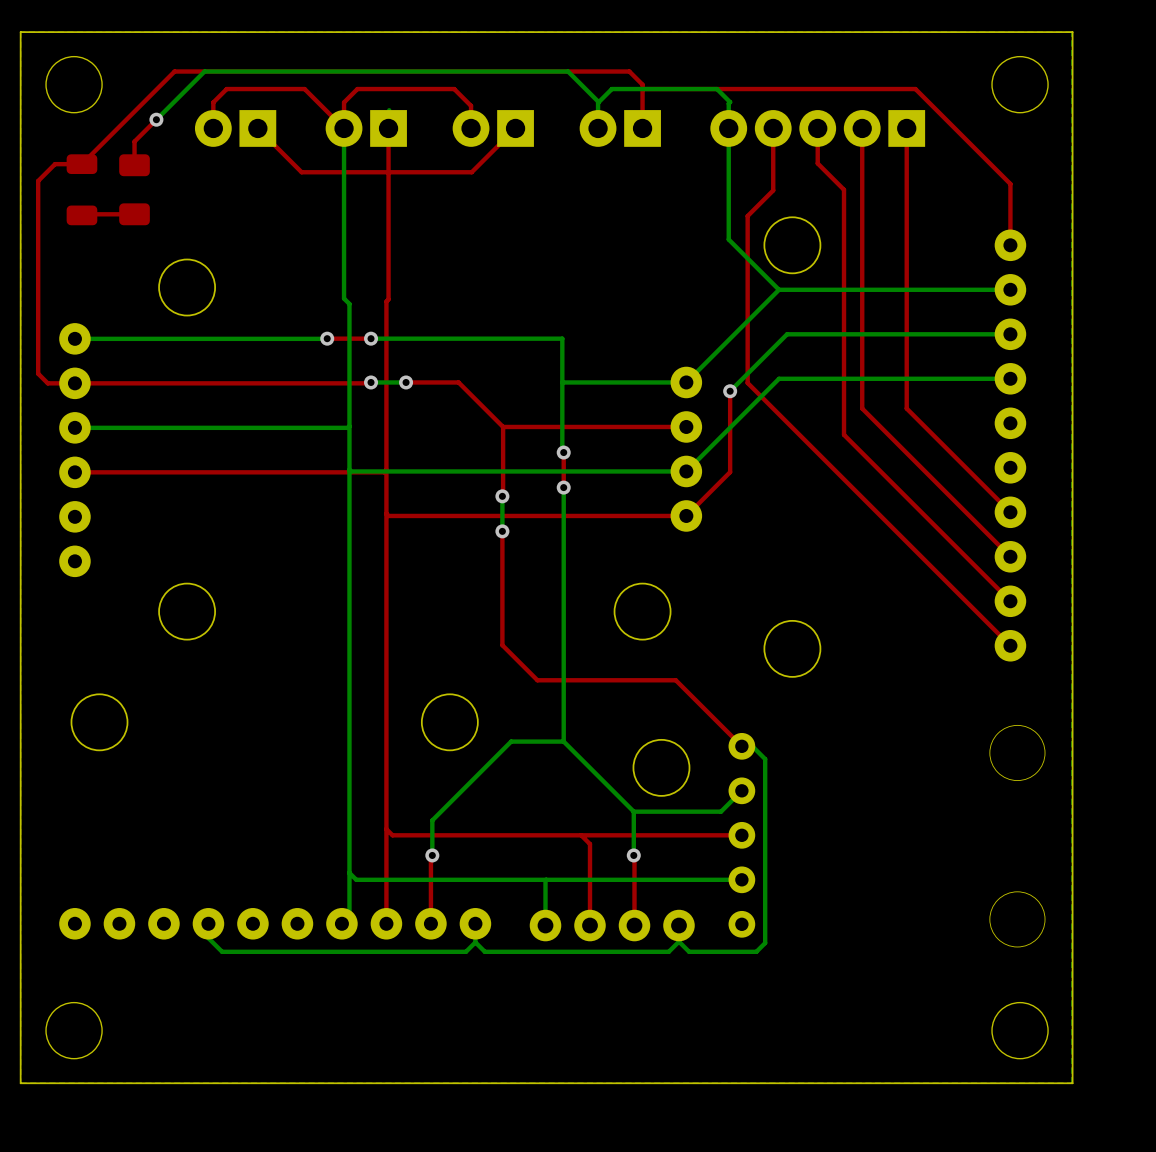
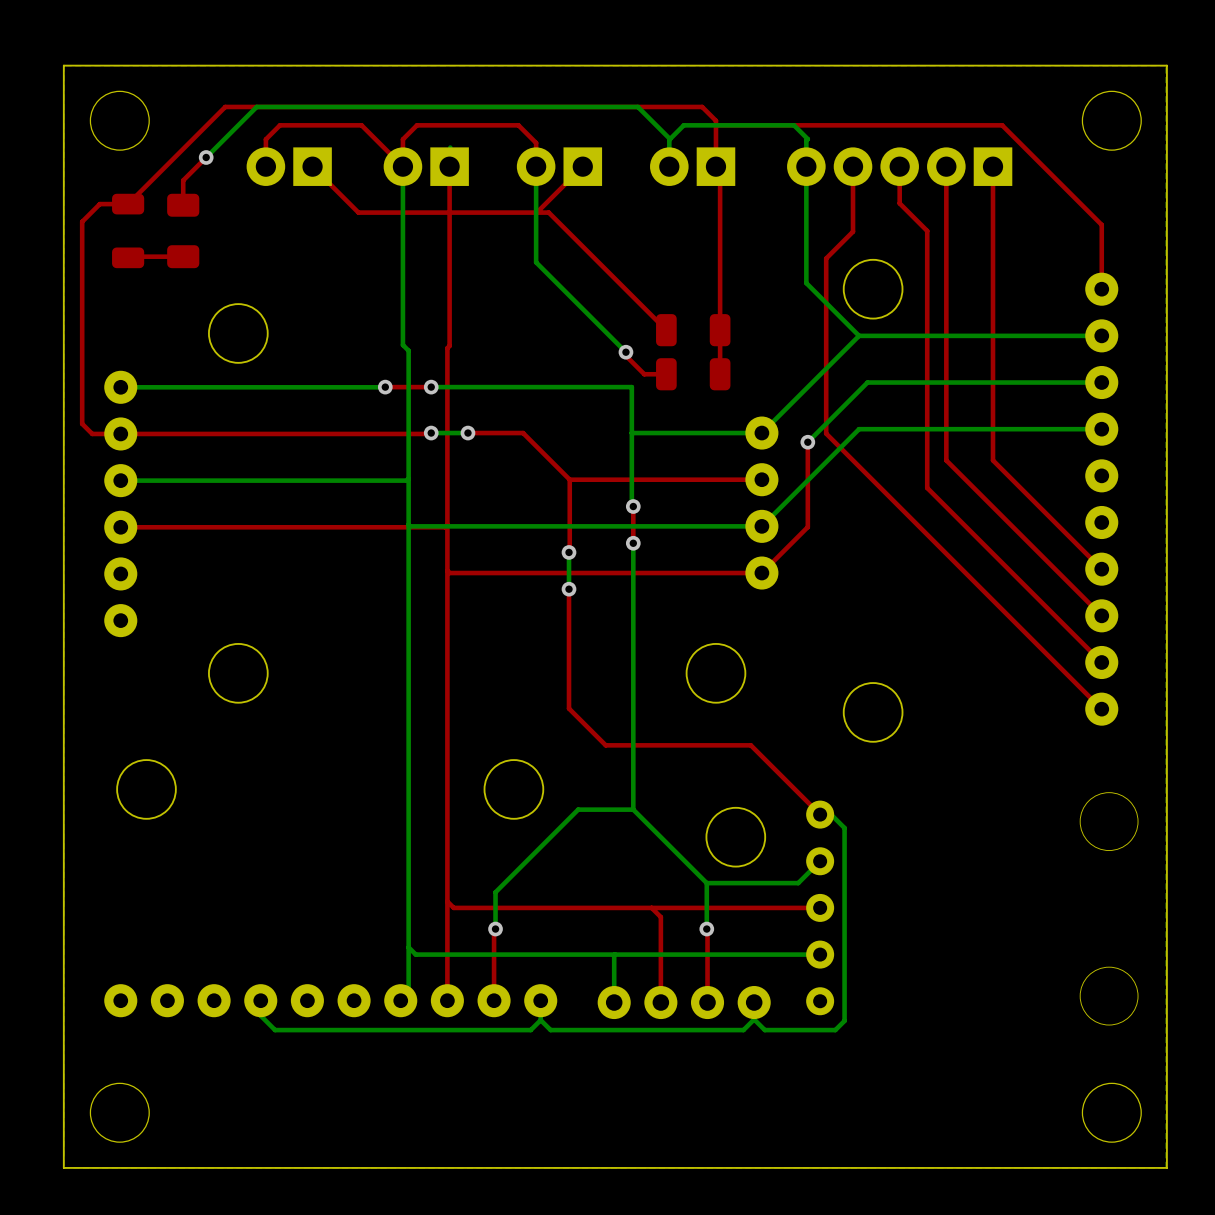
bottom track: none -> (536, 166) (536, 262) (625, 352)
top track: none -> (715, 166) (720, 170) (720, 374)
top track: none -> (536, 212) (548, 212) (666, 330)
part: none -> (693, 330)
top track: none -> (625, 352) (625, 355) (644, 374) (666, 374)
via: none -> (625, 352)
part: none -> (693, 374)

